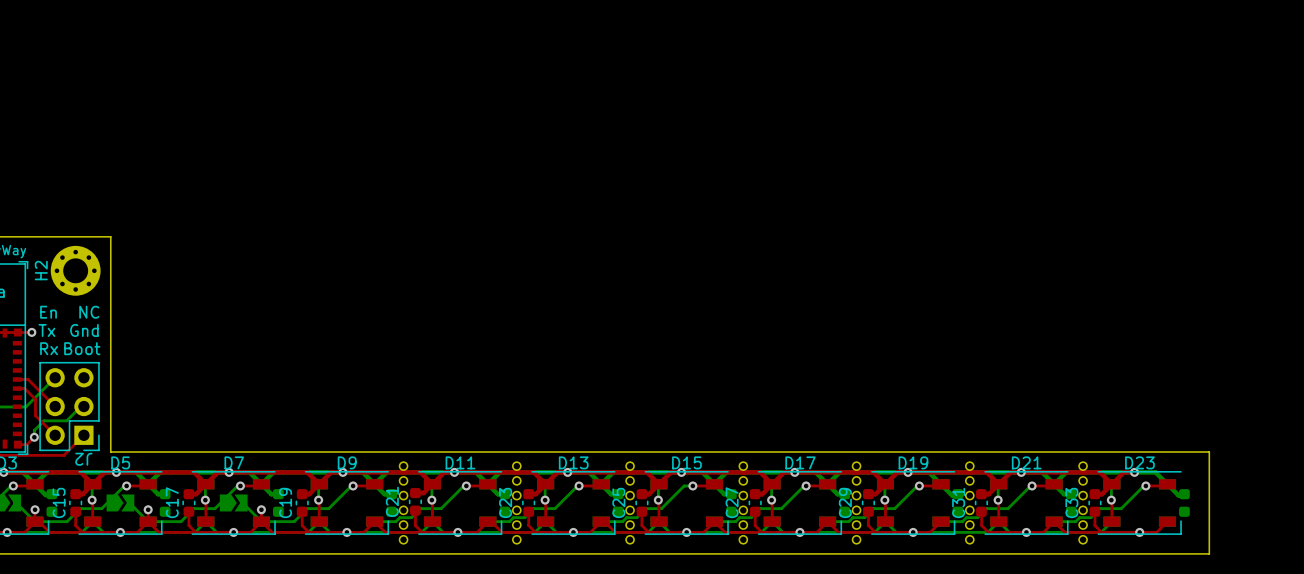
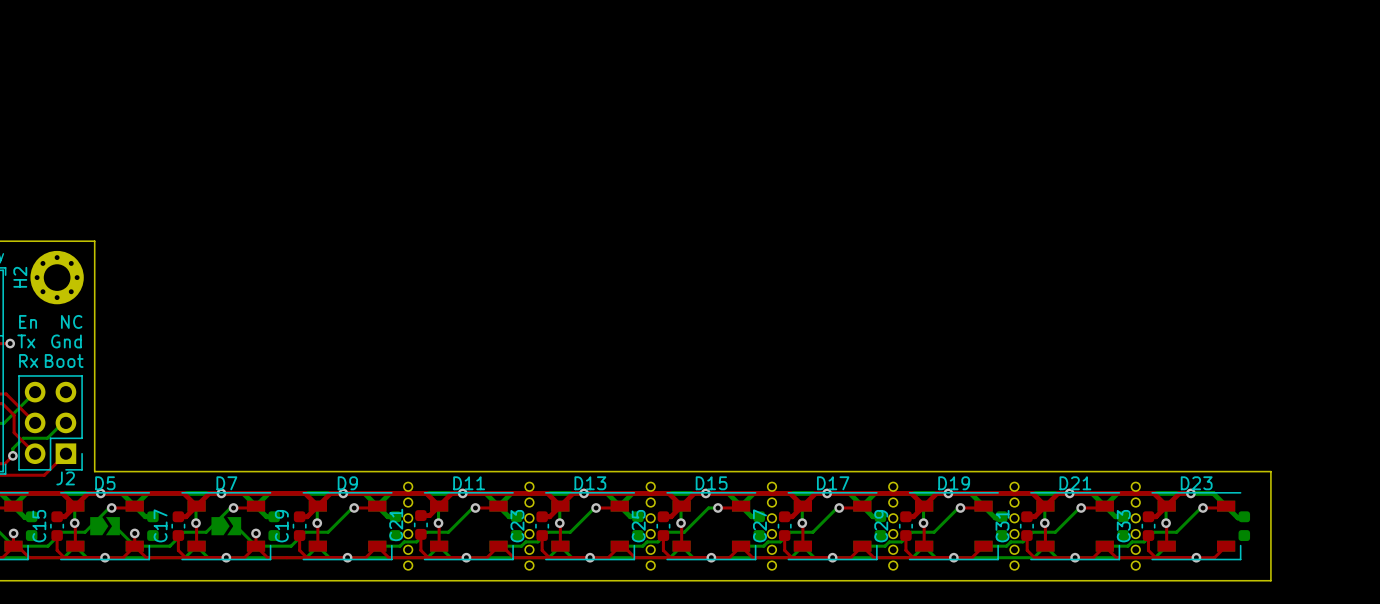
J2 name rotation: 0° (83, 459) -> 180° (65, 478)

